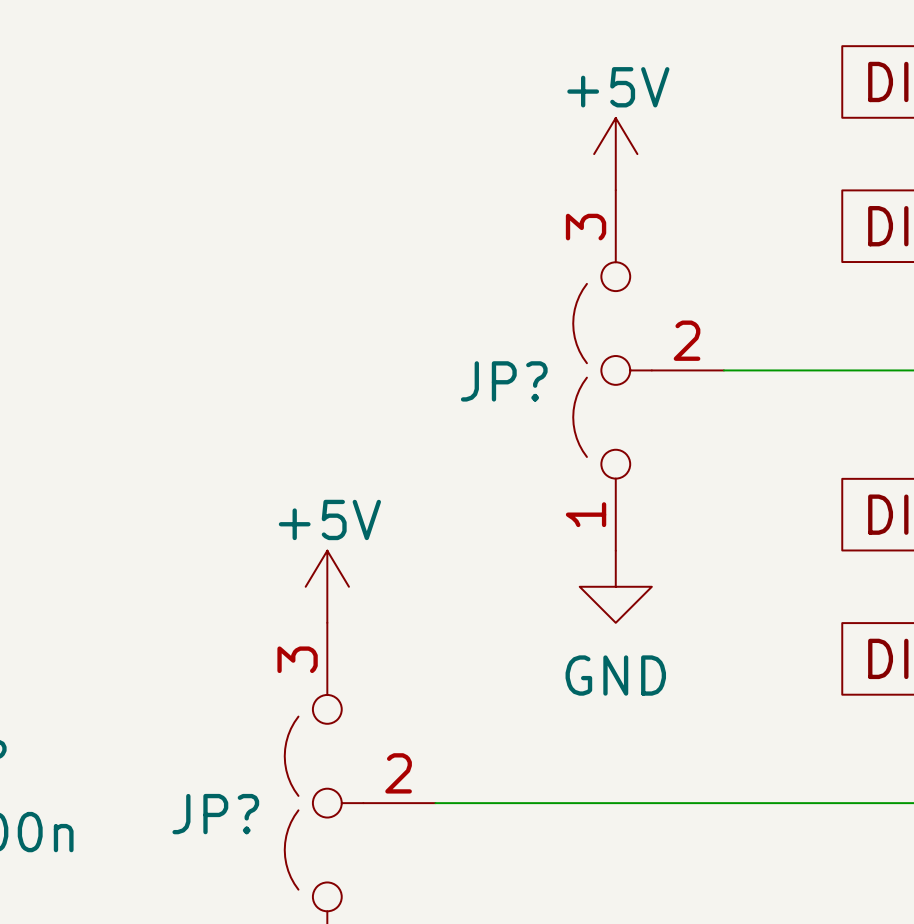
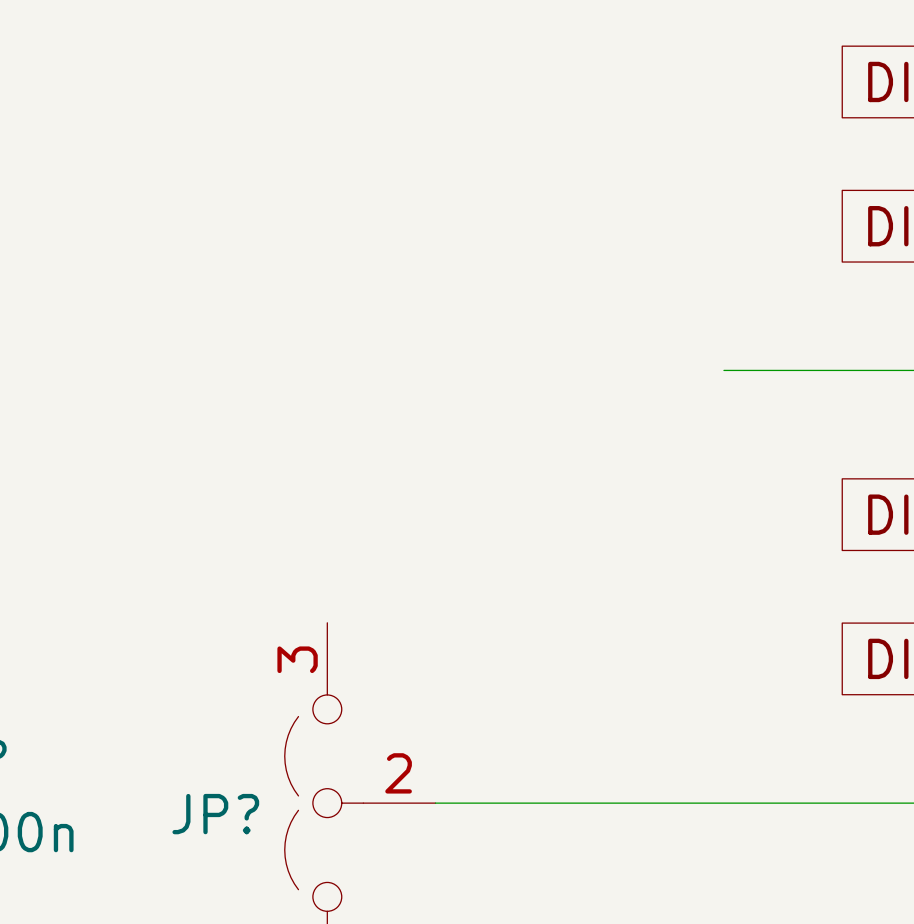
power symbol: +5V (615, 154) -> none
JP?: (648, 370) -> none
power symbol: +5V (327, 586) -> none
power symbol: GND (615, 586) -> none

